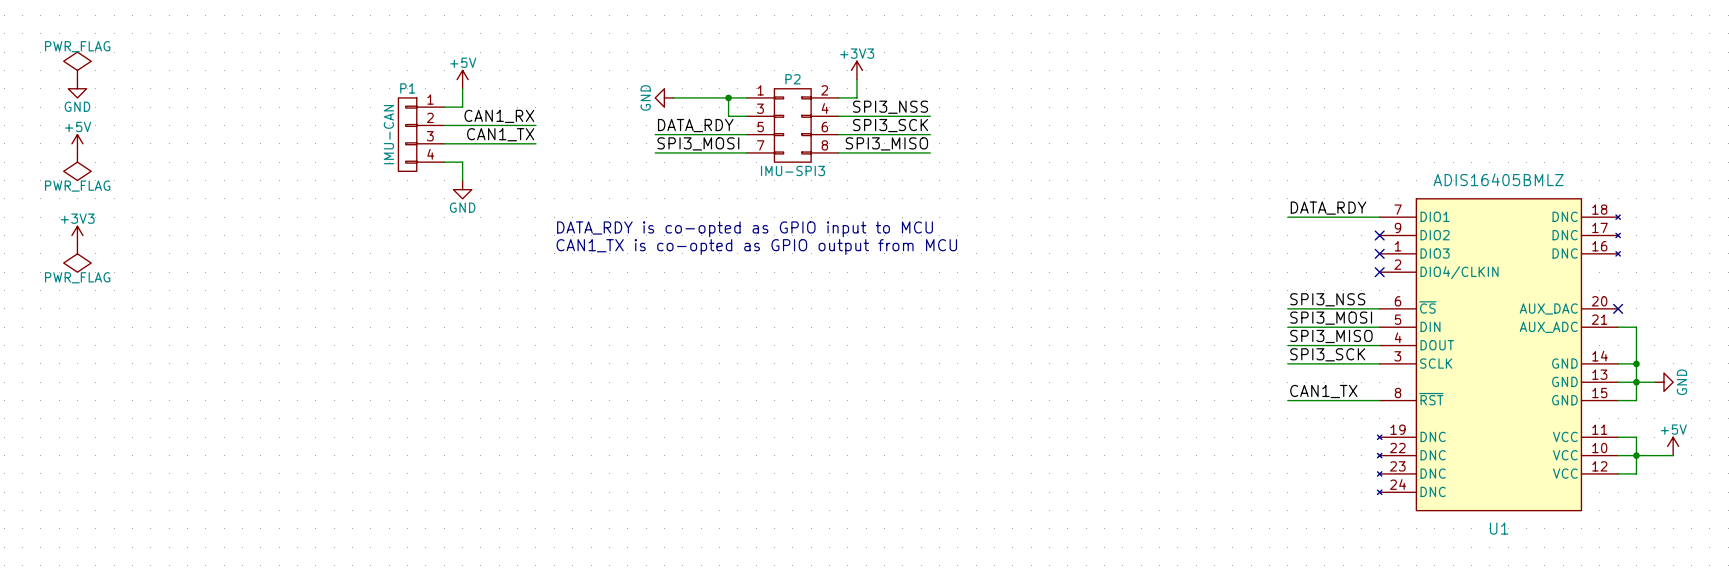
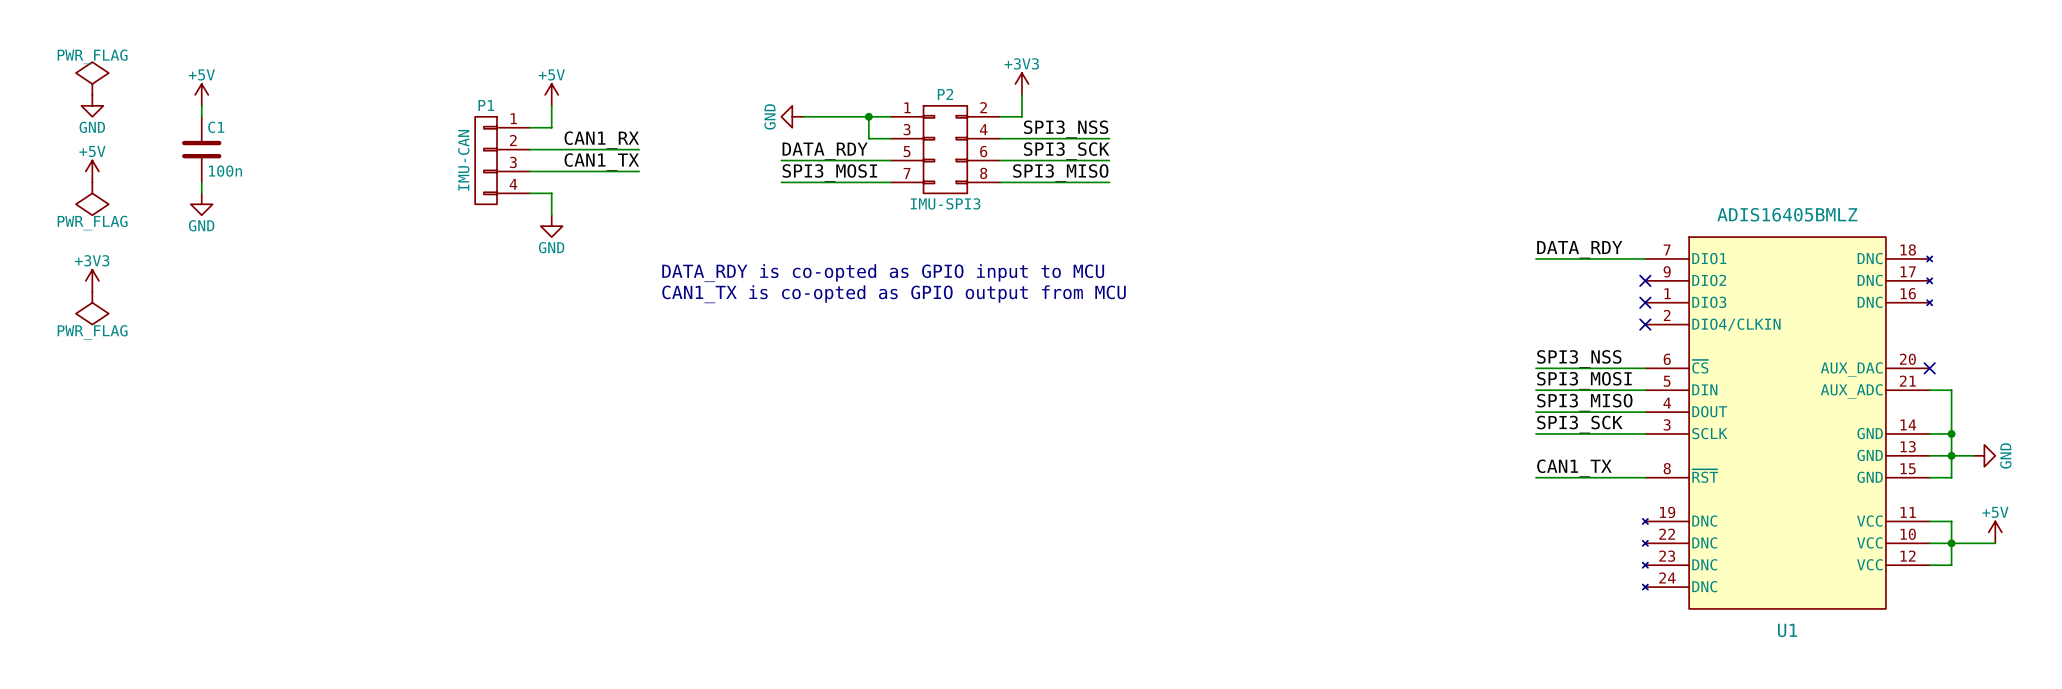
power symbol: none -> +5V (201, 94)
wire: none -> (201, 105) (201, 116)
C1: none -> 100n (201, 149)
wire: none -> (201, 182) (201, 193)
power symbol: none -> GND (201, 204)

